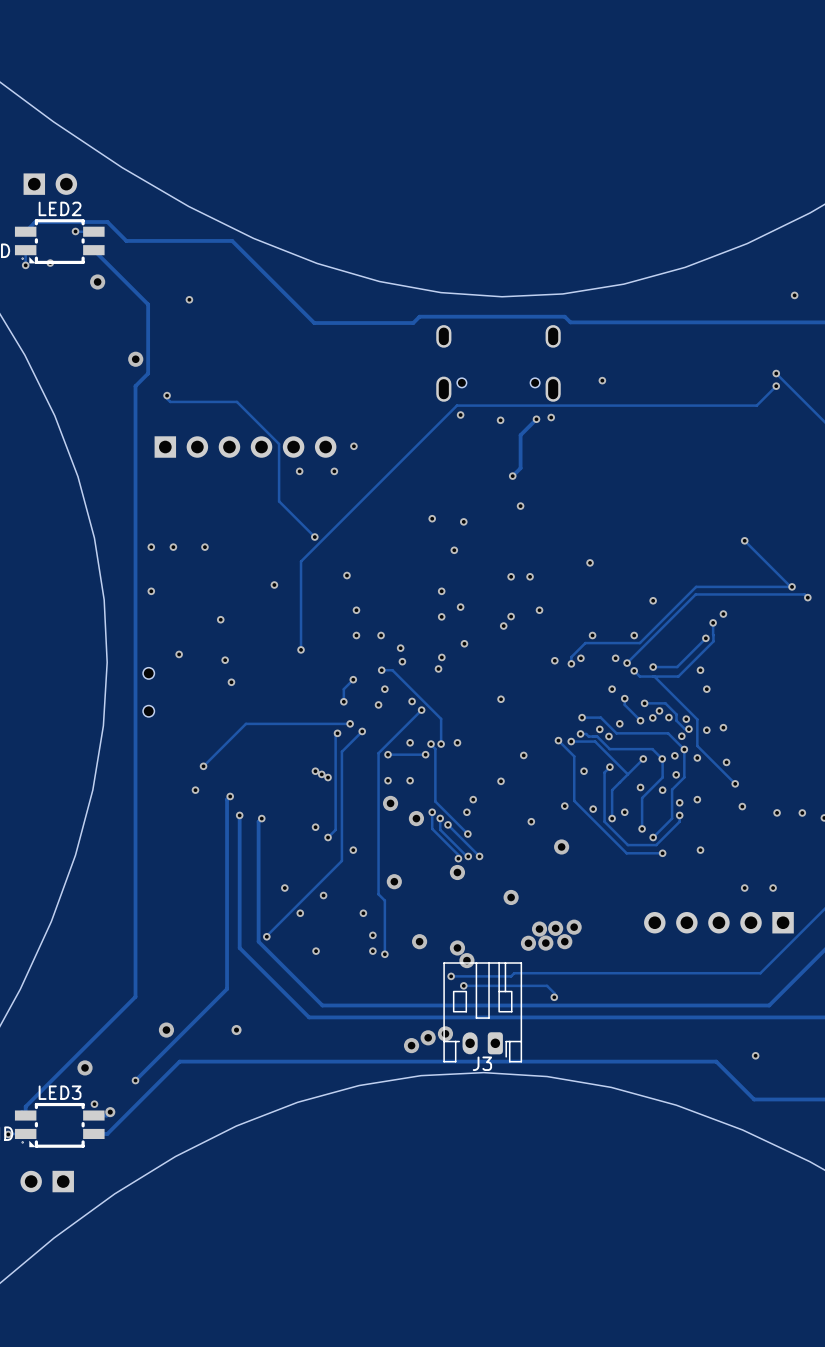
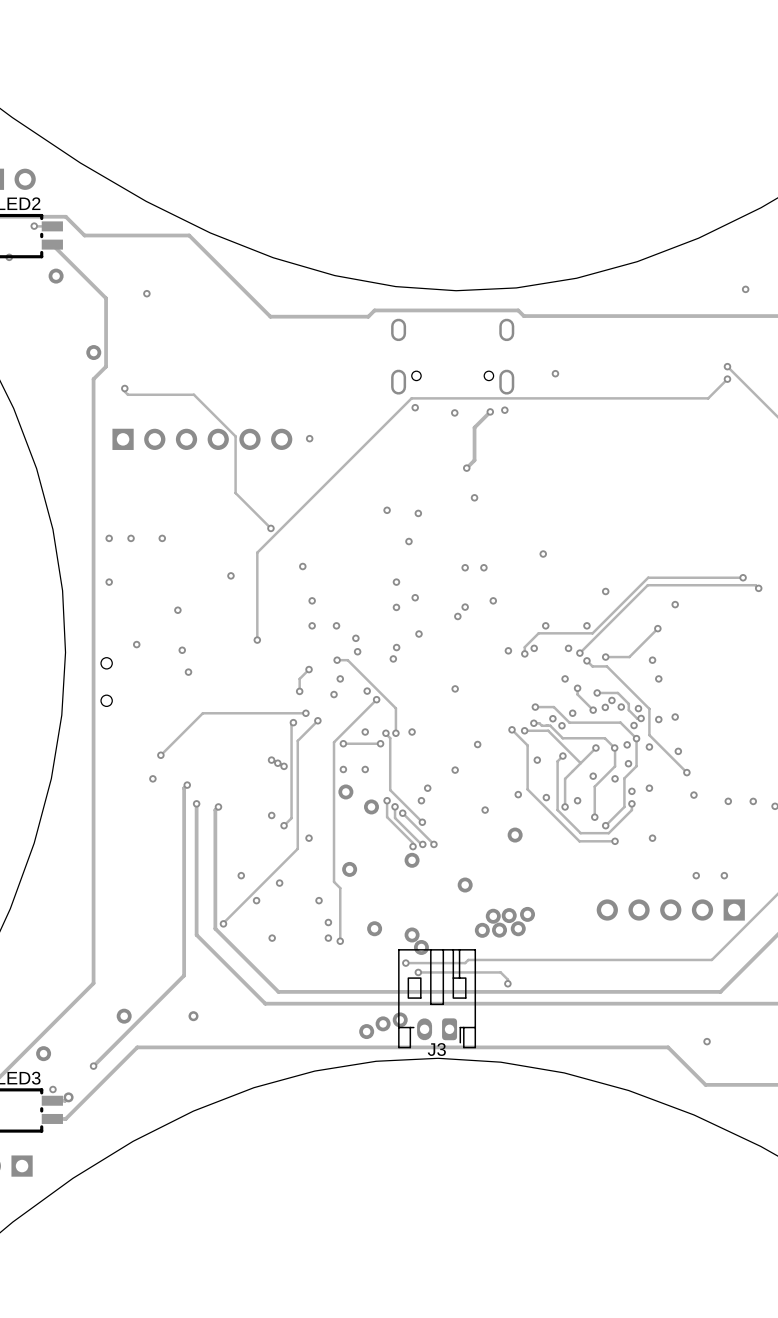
via: (299, 471) -> none
via: (334, 471) -> none
track: (744, 540) (790, 586) -> none
via: (744, 540) -> none
track: (713, 622) (713, 641) (678, 676) (654, 676) -> none
via: (713, 622) -> none

